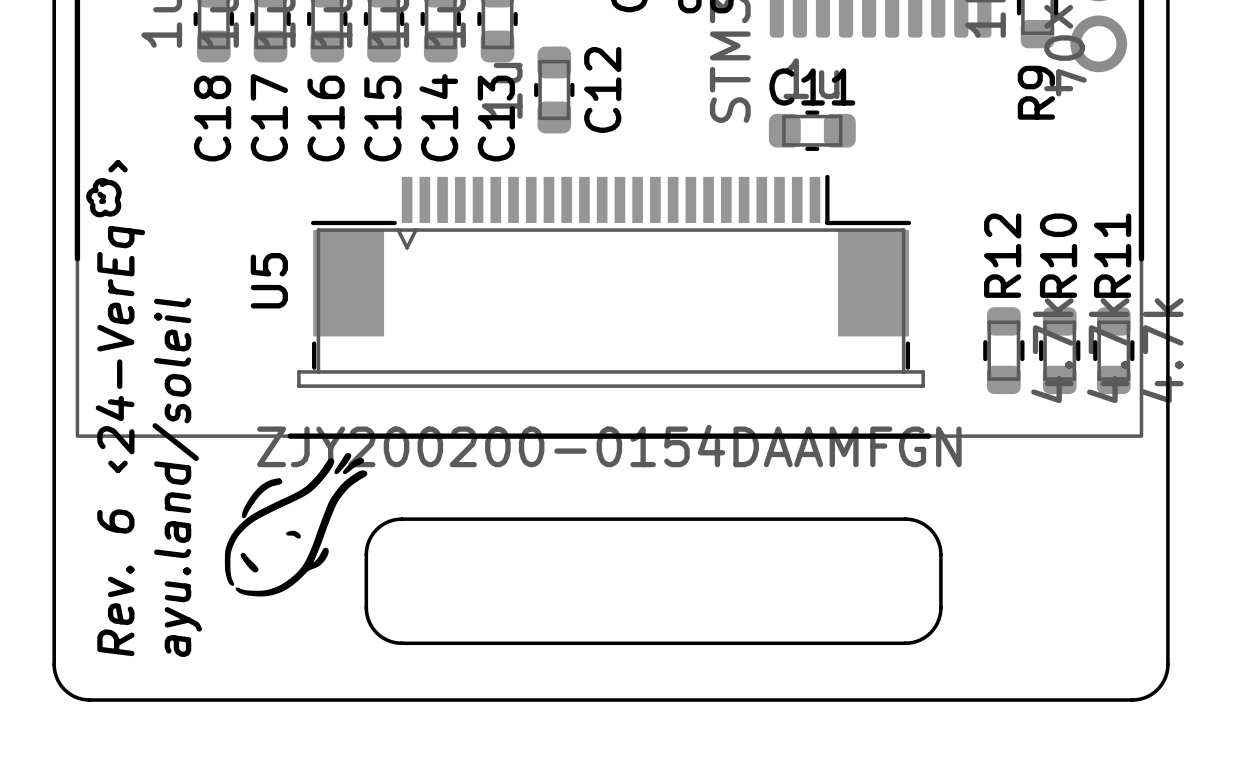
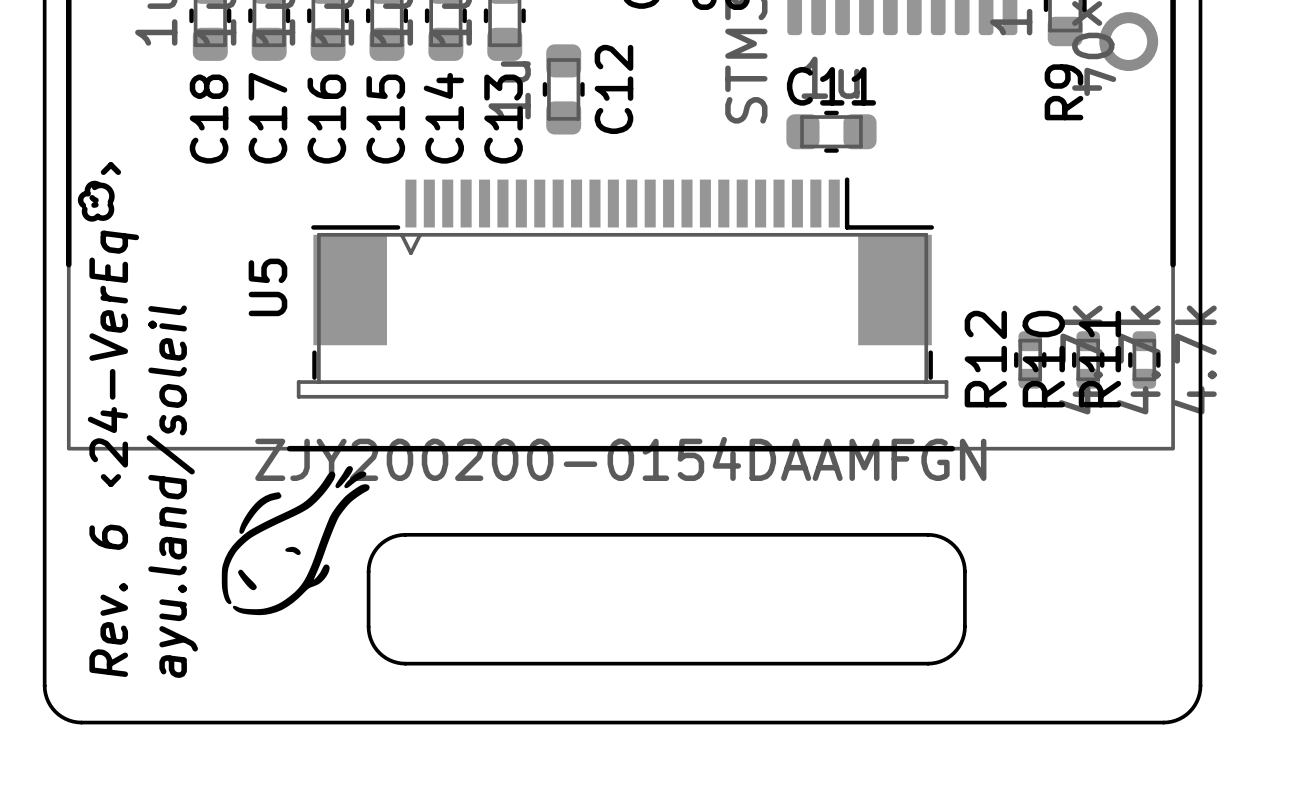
R12 name position: R12 (1002, 255) -> R12 (985, 359)
R10 name position: R10 (1058, 255) -> R10 (1043, 359)
R11 name position: R11 (1112, 255) -> R11 (1099, 359)
R12 footprint: [983, 307, 1025, 395] -> [1014, 331, 1047, 389]
R10 footprint: [1039, 307, 1081, 395] -> [1072, 331, 1105, 389]
R11 footprint: [1093, 307, 1135, 395] -> [1128, 331, 1161, 389]

